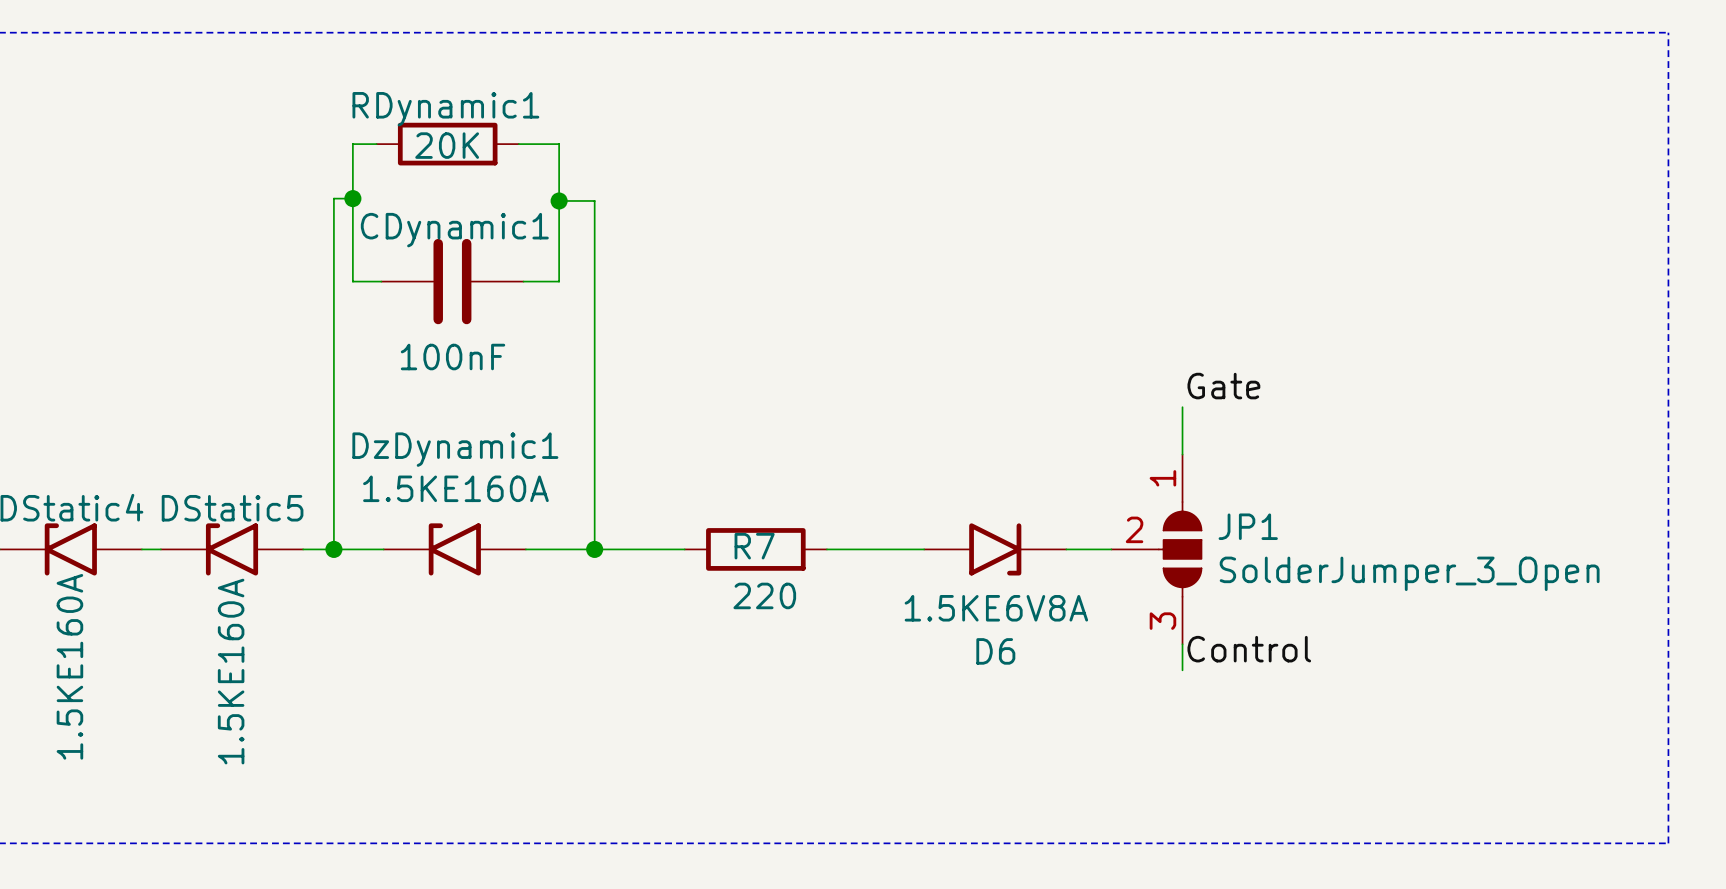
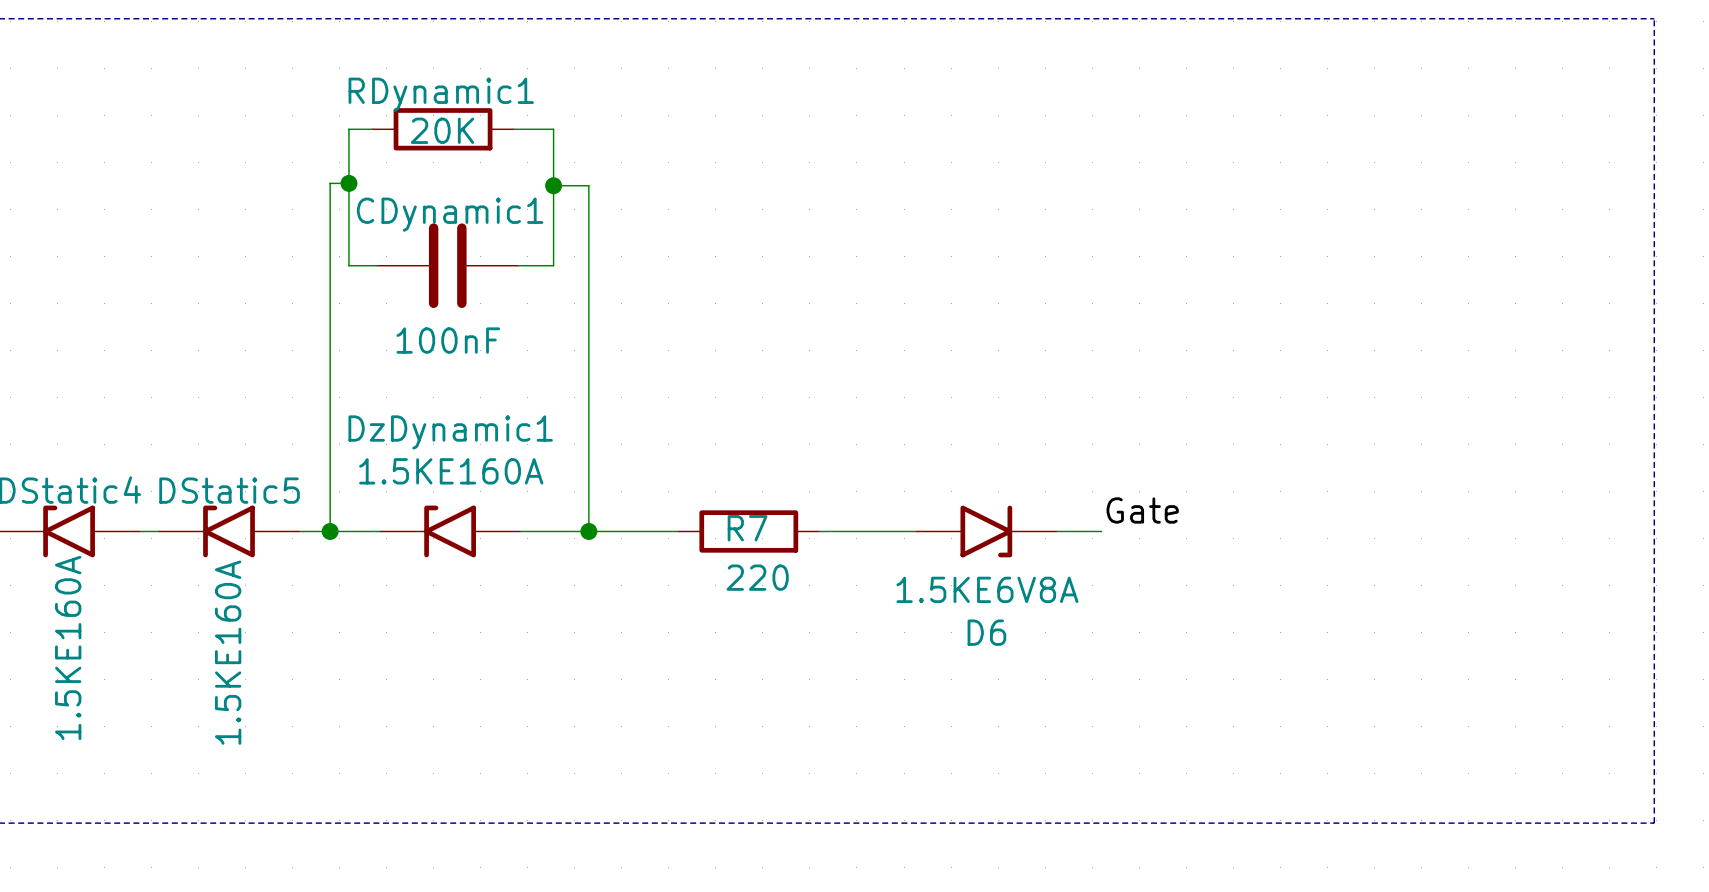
label position: Gate (1223, 386) -> Gate (1142, 510)
wire: (1182, 407) (1182, 454) -> none
JP1: SolderJumper_3_Open (1156, 549) -> none
wire: (1182, 644) (1182, 670) -> none
label: Control (1249, 649) -> none

